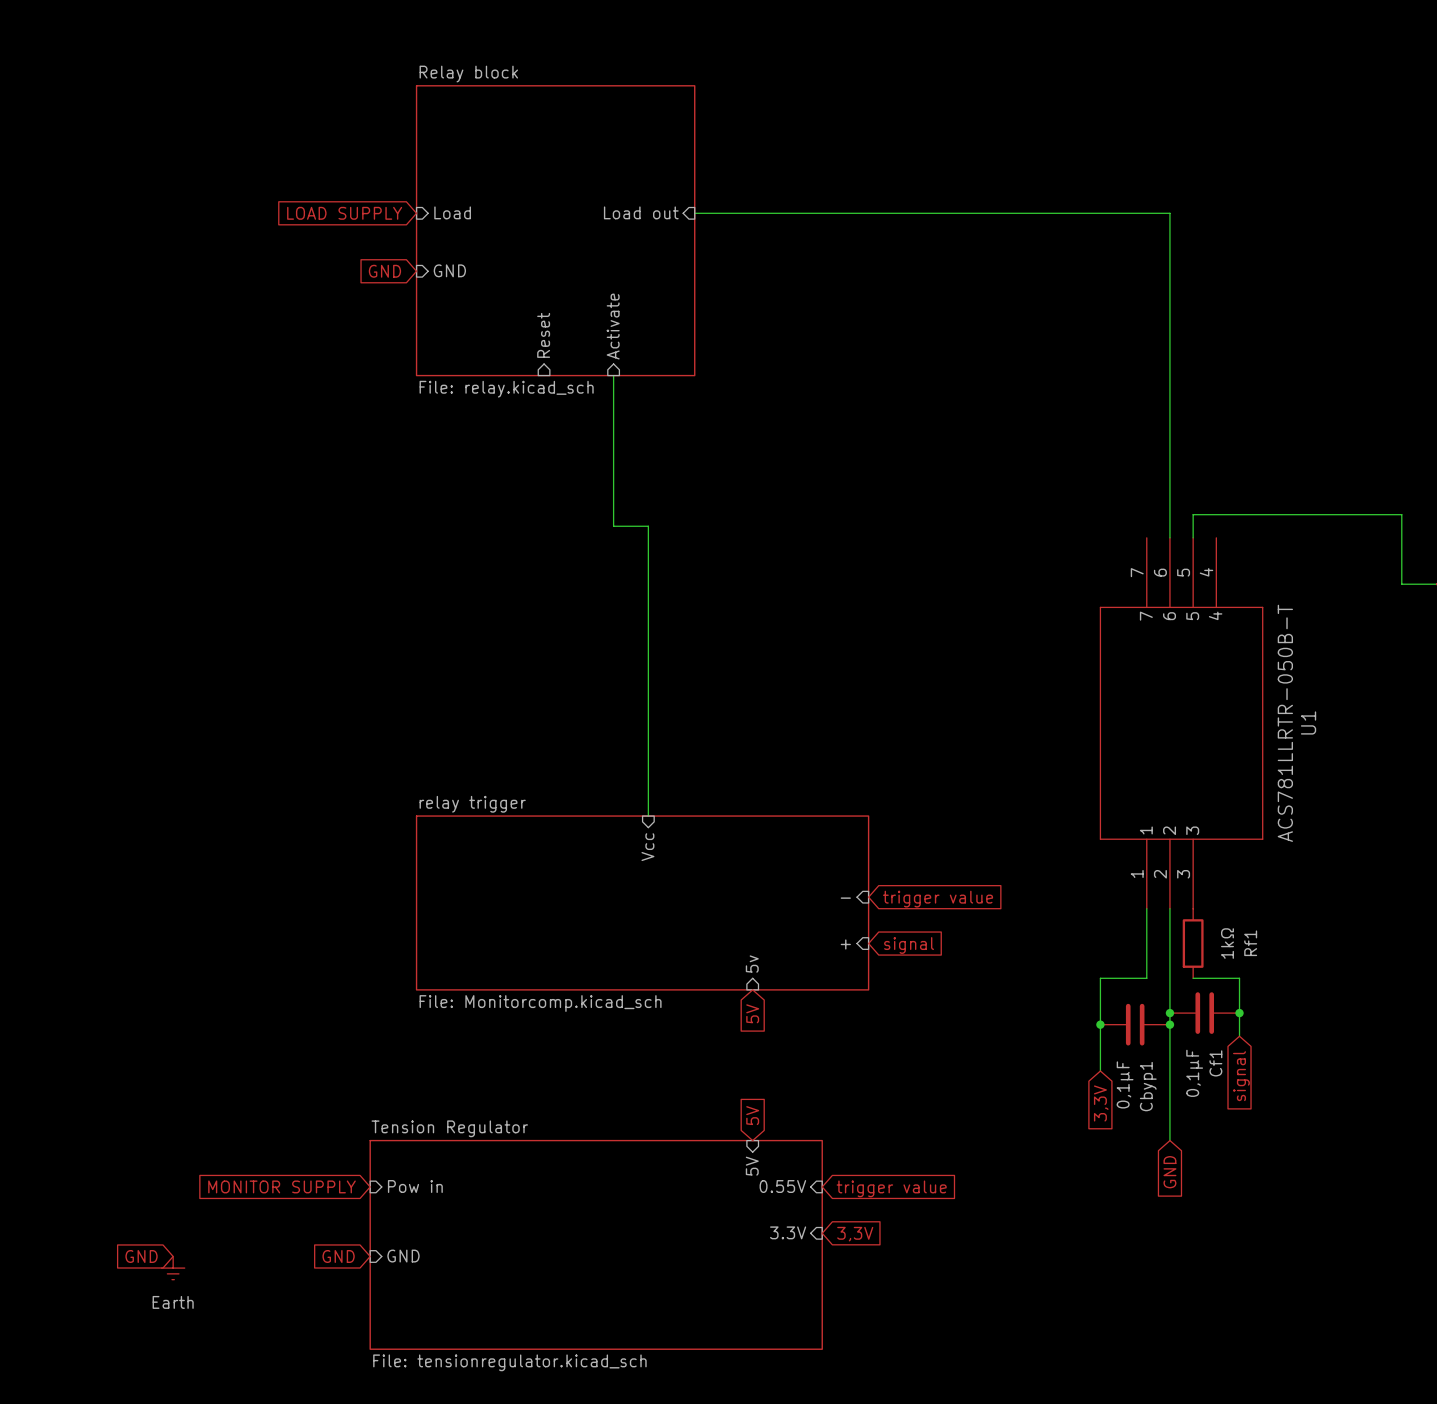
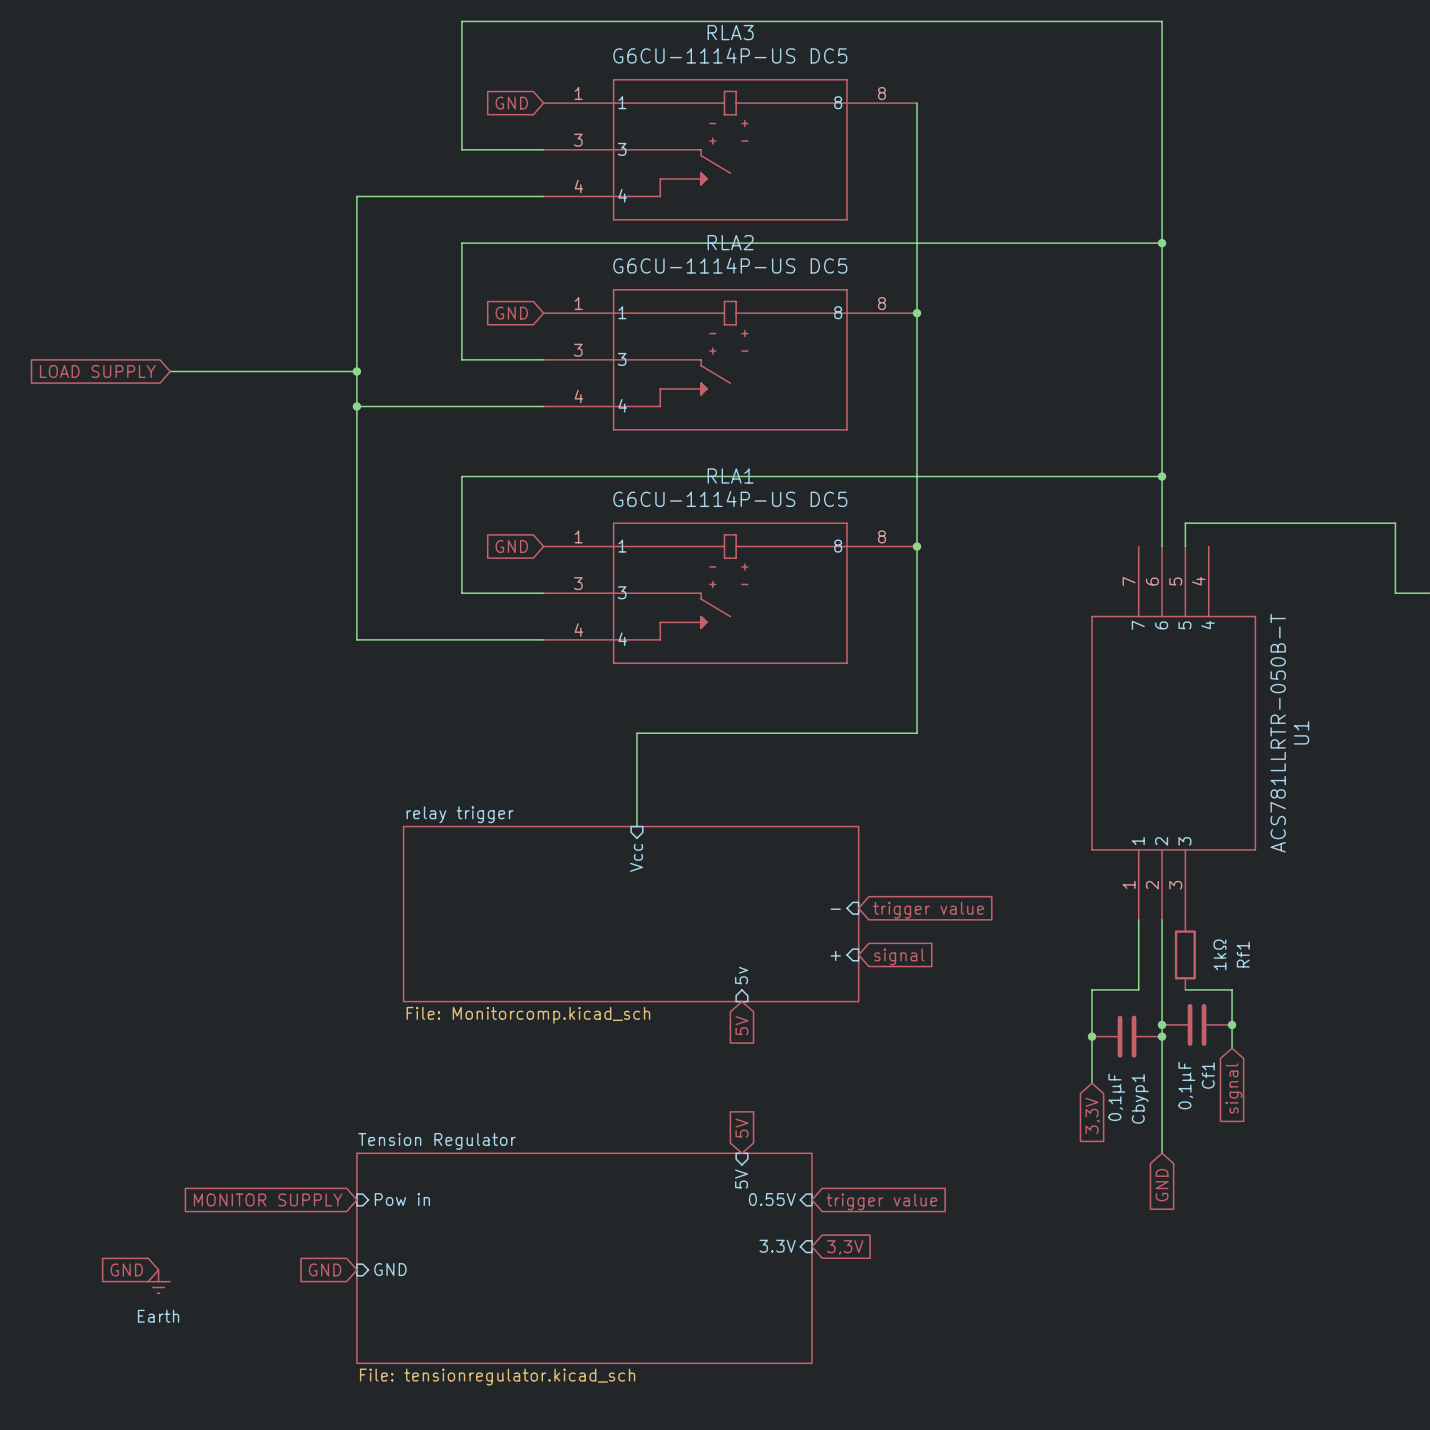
global label: none -> GND (511, 103)
RLA3: none -> G6CU-1114P-US DC5 (730, 149)
wire: none -> (543, 196) (356, 196) (356, 639) (543, 639)
sheet pin: Load (452, 212) -> none
sheet pin: Load out (641, 212) -> none
global label: LOAD SUPPLY (344, 213) -> none
wire: (694, 213) (1169, 213) -> (543, 149) (461, 149) (461, 21) (1162, 21) (1162, 219)
sheet Relay block: File: relay.kicad_sch (555, 230) -> none
wire: none -> (1162, 243) (461, 243) (461, 359) (543, 359)
junction: none -> (1162, 243)
sheet pin: GND (449, 270) -> none
global label: GND (384, 271) -> none
global label: none -> GND (511, 313)
junction: none -> (917, 313)
sheet pin: Activate (613, 326) -> none
sheet pin: Reset (543, 335) -> none
RLA2: none -> G6CU-1114P-US DC5 (730, 359)
global label: none -> LOAD SUPPLY (97, 371)
wire: none -> (170, 371) (356, 371)
junction: none -> (356, 371)
wire: (613, 375) (613, 526) (648, 526) (648, 723) -> (917, 103) (917, 733) (636, 733)
wire: none -> (356, 406) (543, 406)
junction: none -> (356, 406)
wire: none -> (1162, 476) (461, 476) (461, 593) (543, 593)
junction: none -> (1162, 476)
global label: none -> GND (511, 546)
junction: none -> (917, 546)
RLA1: none -> G6CU-1114P-US DC5 (730, 593)

